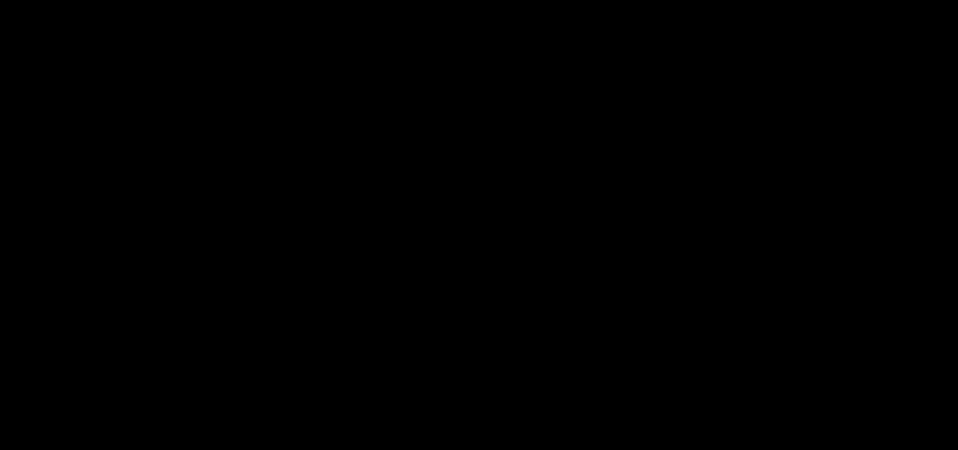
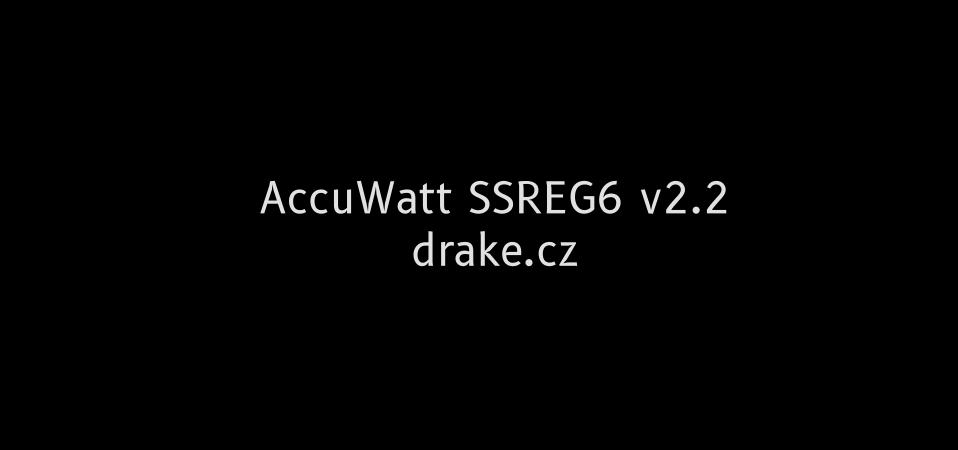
text: none -> AccuWatt SSREG6 v2.2 (493, 197)
text: none -> drake.cz (495, 248)

